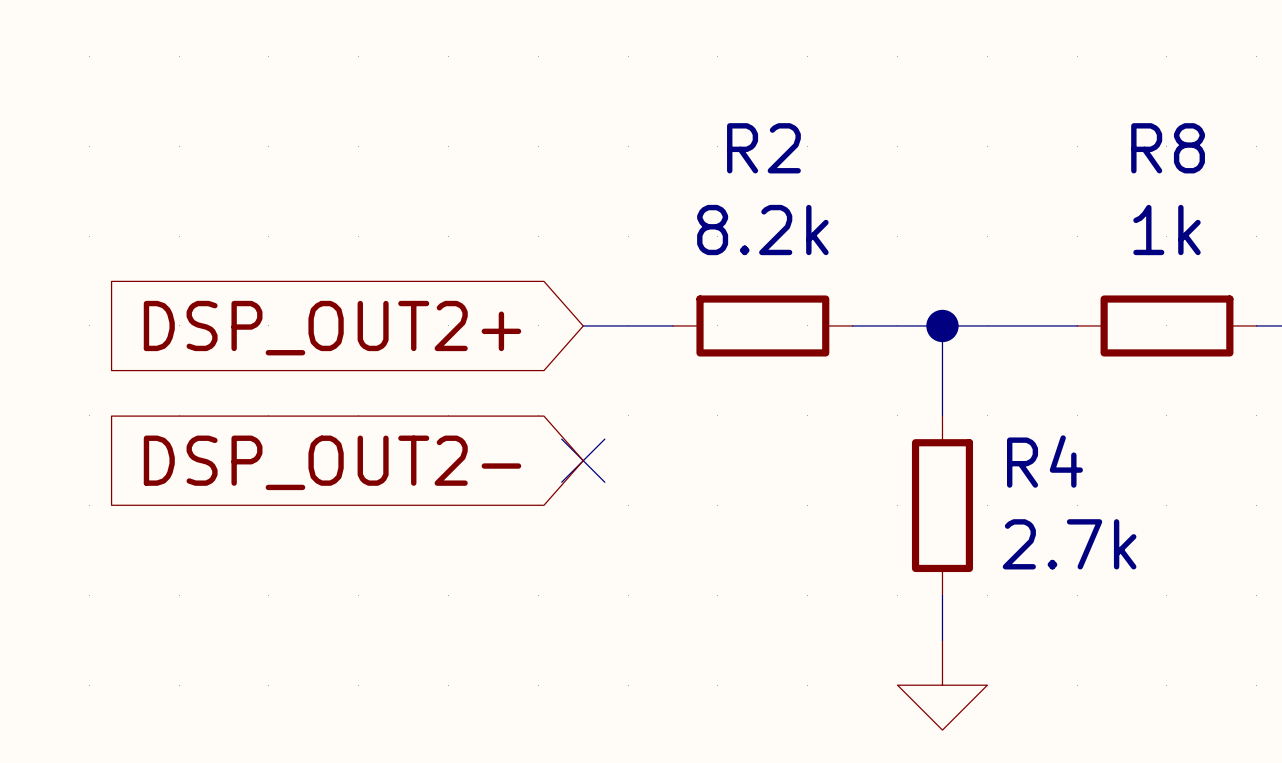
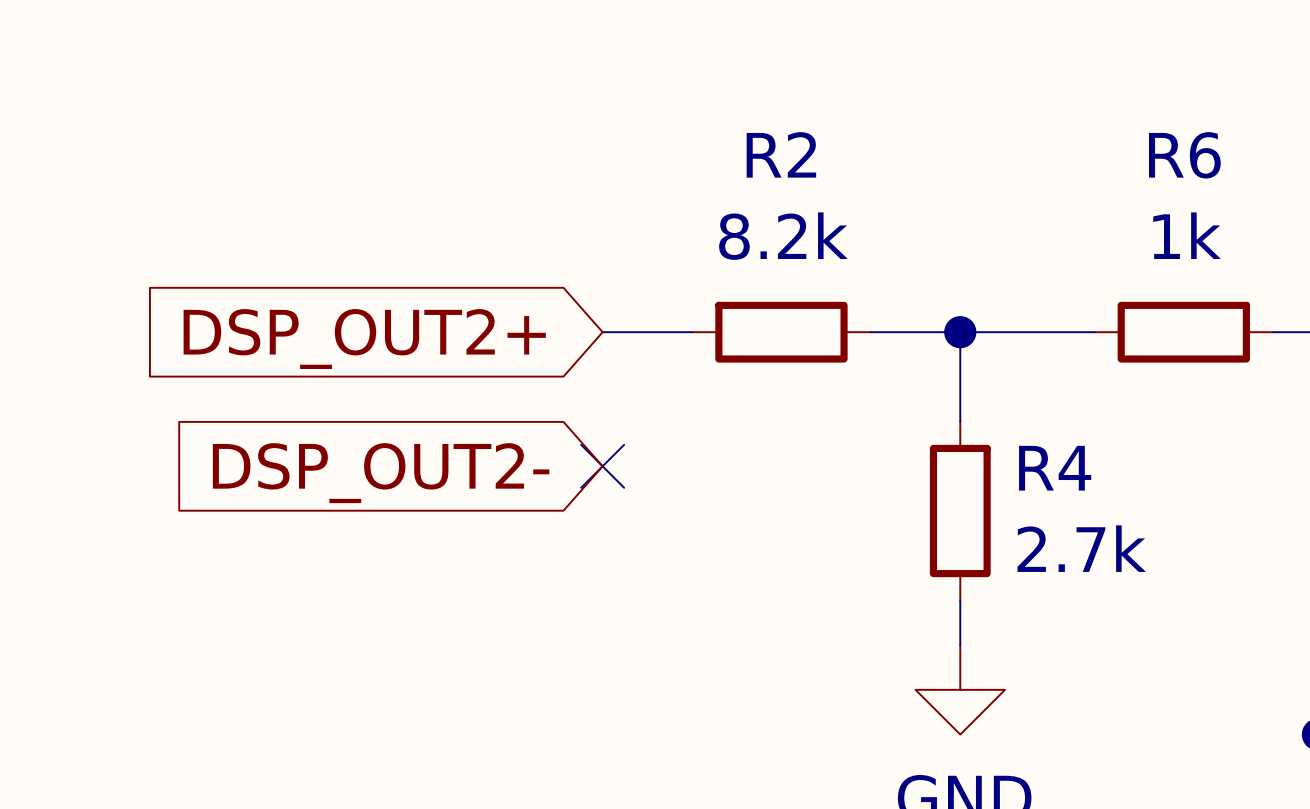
R8 name: R8 (1168, 148) -> R6 (1184, 155)

